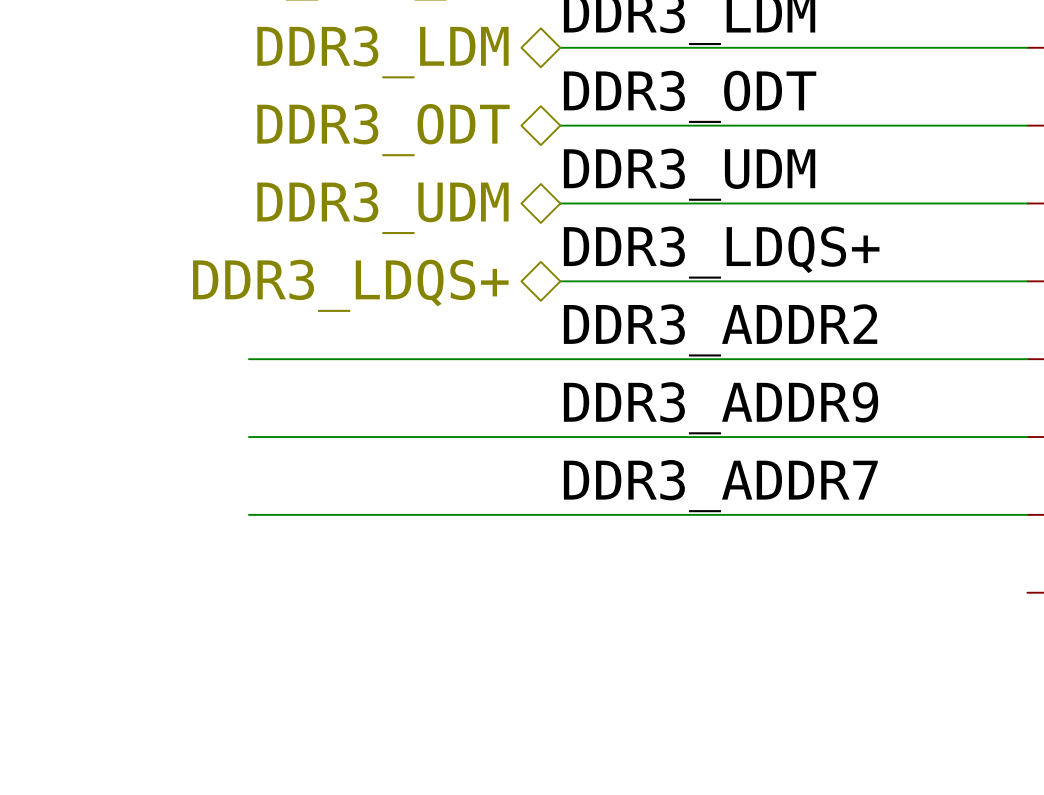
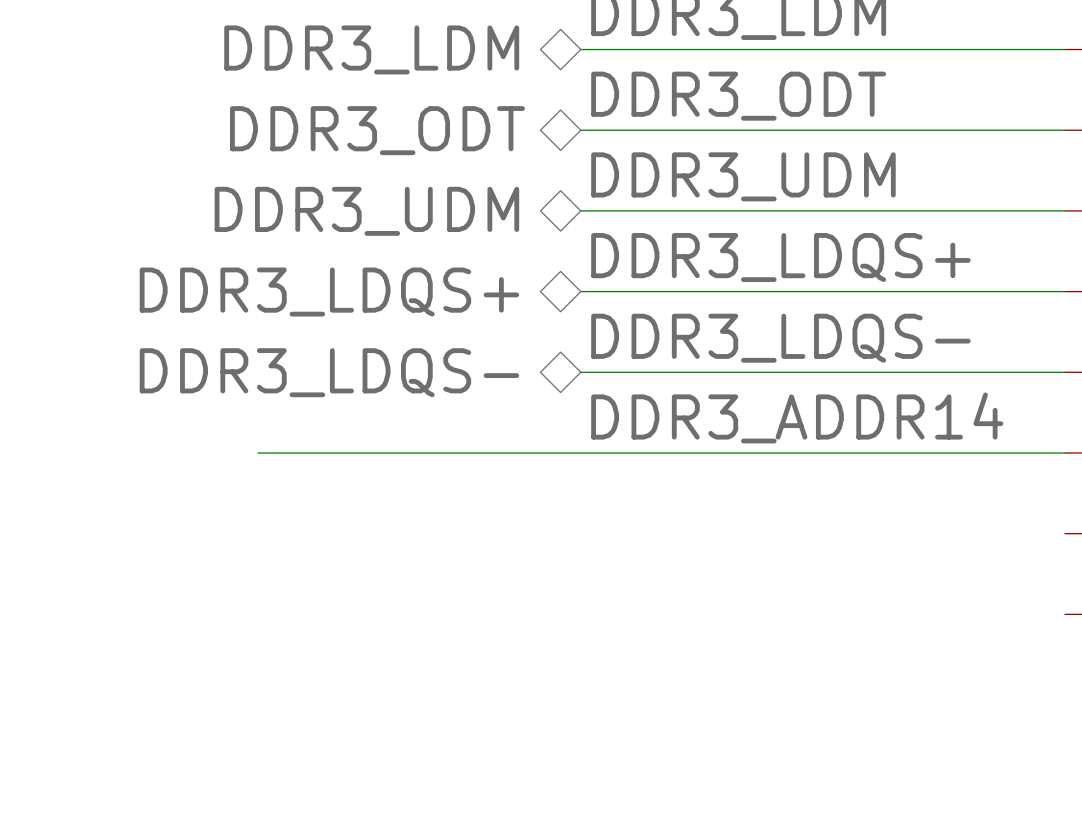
label: DDR3_ADDR2 (720, 330) -> DDR3_LDQS- (780, 338)
wire: (248, 359) (560, 359) -> none
hierarchical label: none -> DDR3_LDQS- (329, 372)
label: DDR3_ADDR9 (721, 408) -> DDR3_ADDR14 (797, 417)
label: DDR3_ADDR7 (720, 486) -> none
wire: (248, 514) (1027, 514) -> none

